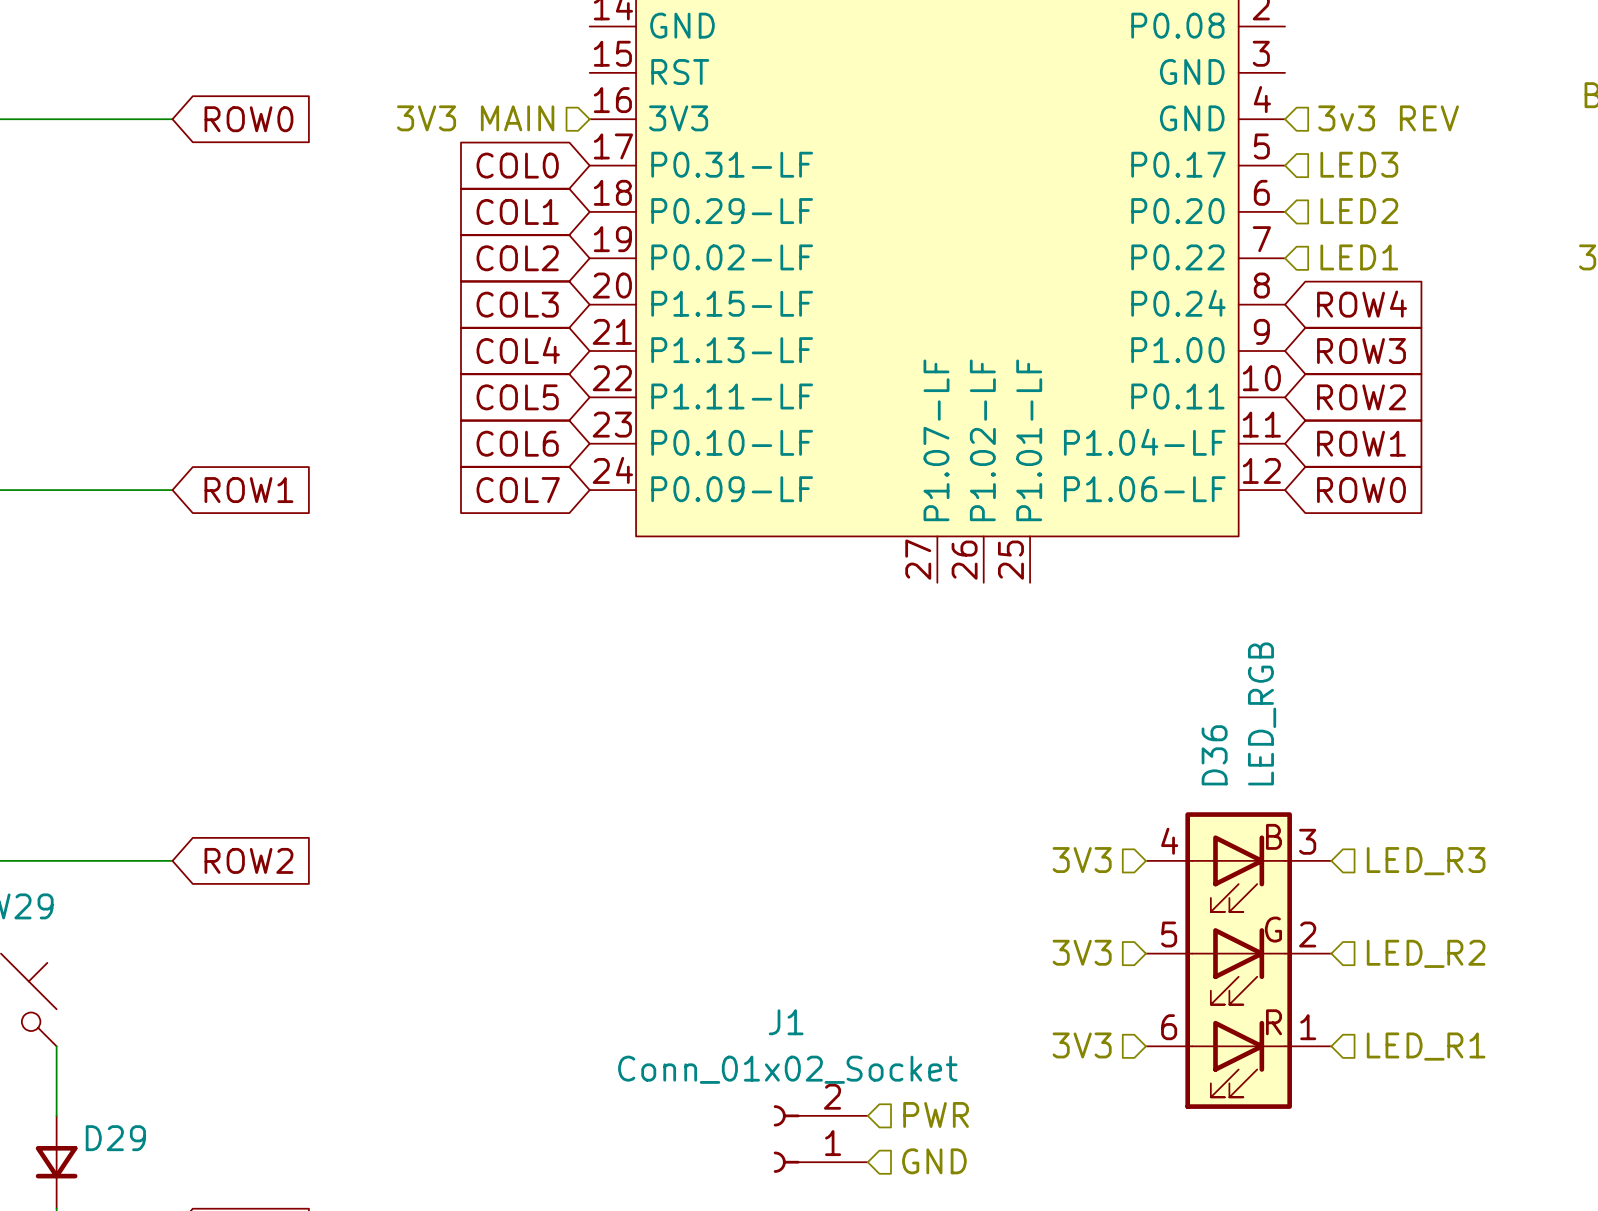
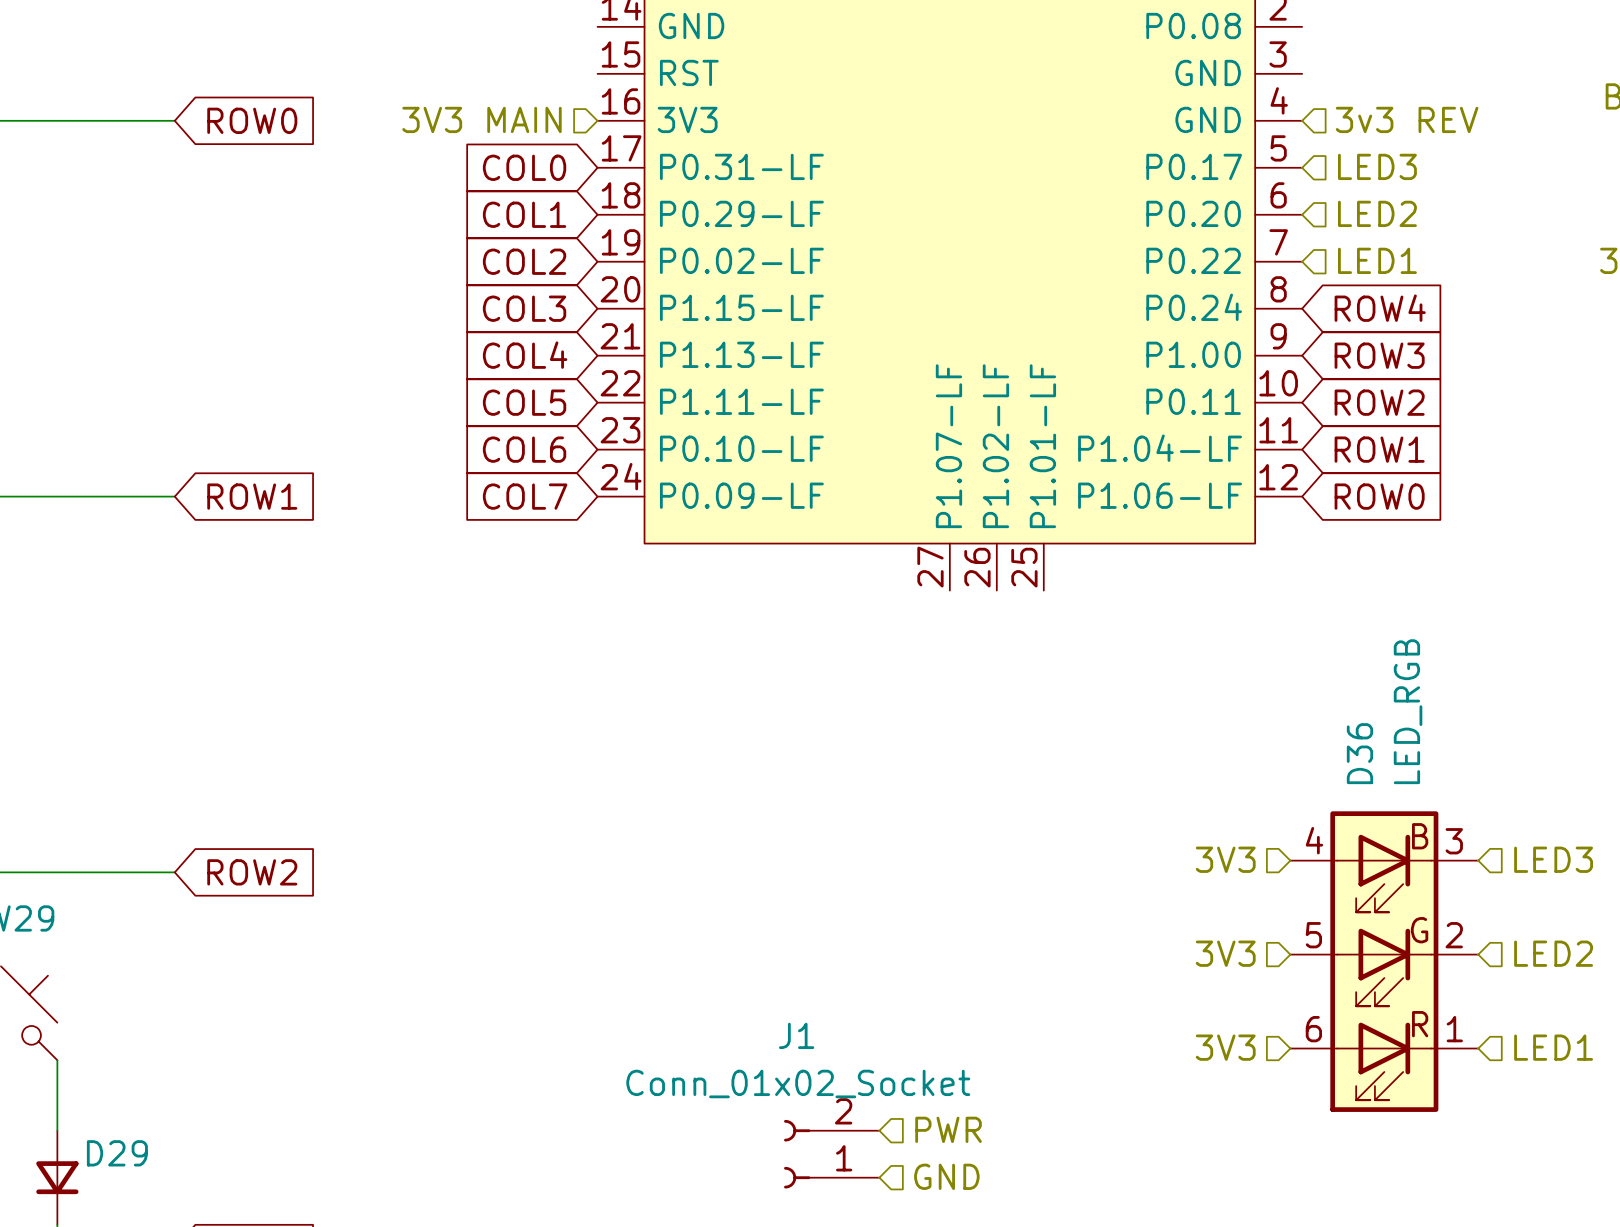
hierarchical label: none -> 3V3 (1225, 859)
hierarchical label: 3V3 (1082, 860) -> none
hierarchical label: LED_R3 (1426, 861) -> LED3 (1553, 859)
hierarchical label: none -> 3V3 (1225, 953)
hierarchical label: 3V3 (1082, 952) -> none
hierarchical label: LED_R2 (1426, 953) -> LED2 (1553, 953)
D36 position: (1238, 960) -> (1384, 961)
hierarchical label: none -> 3V3 (1225, 1047)
hierarchical label: 3V3 (1082, 1045) -> none
hierarchical label: LED_R1 (1426, 1046) -> LED1 (1553, 1047)

